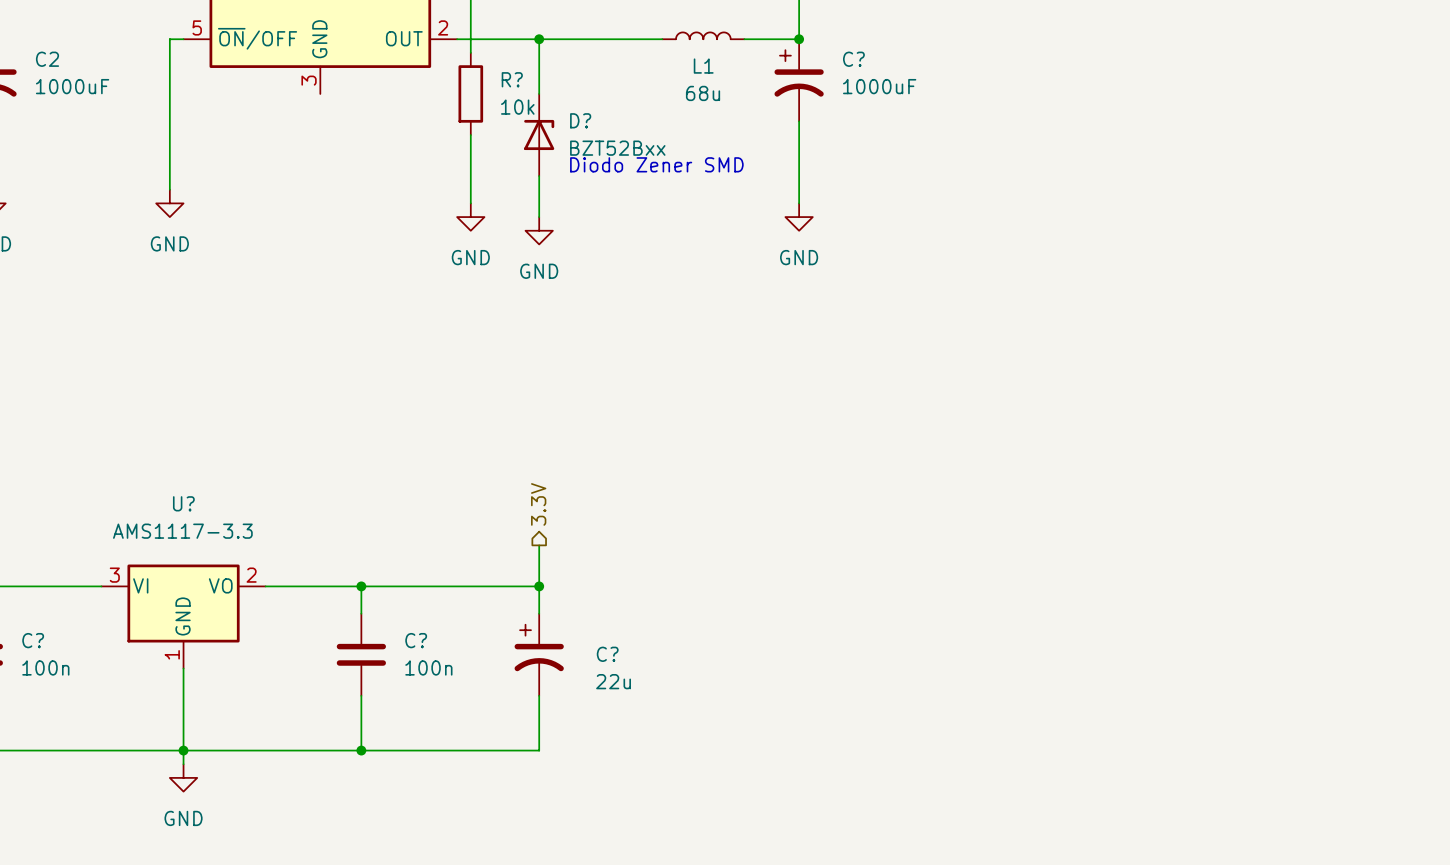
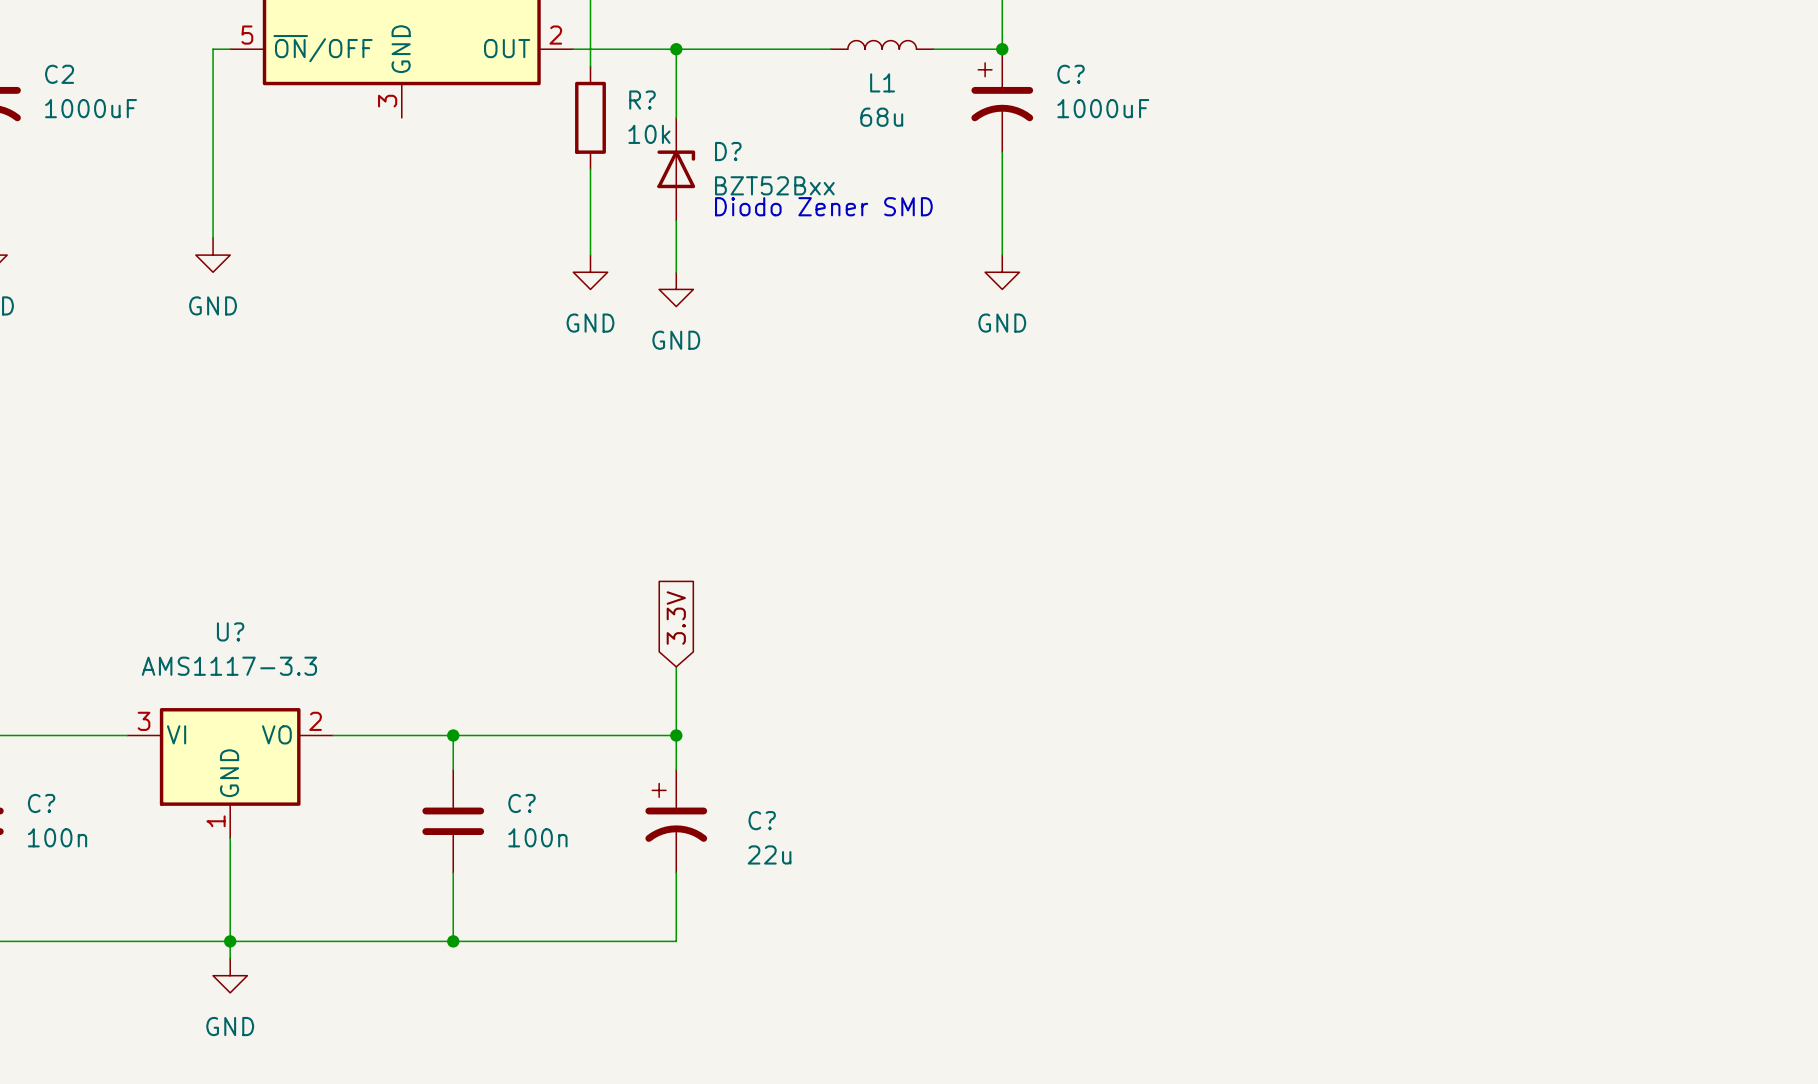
global label: none -> 3.3V (676, 618)
hierarchical label: 3.3V (538, 504) -> none
wire: none -> (676, 666) (676, 684)

